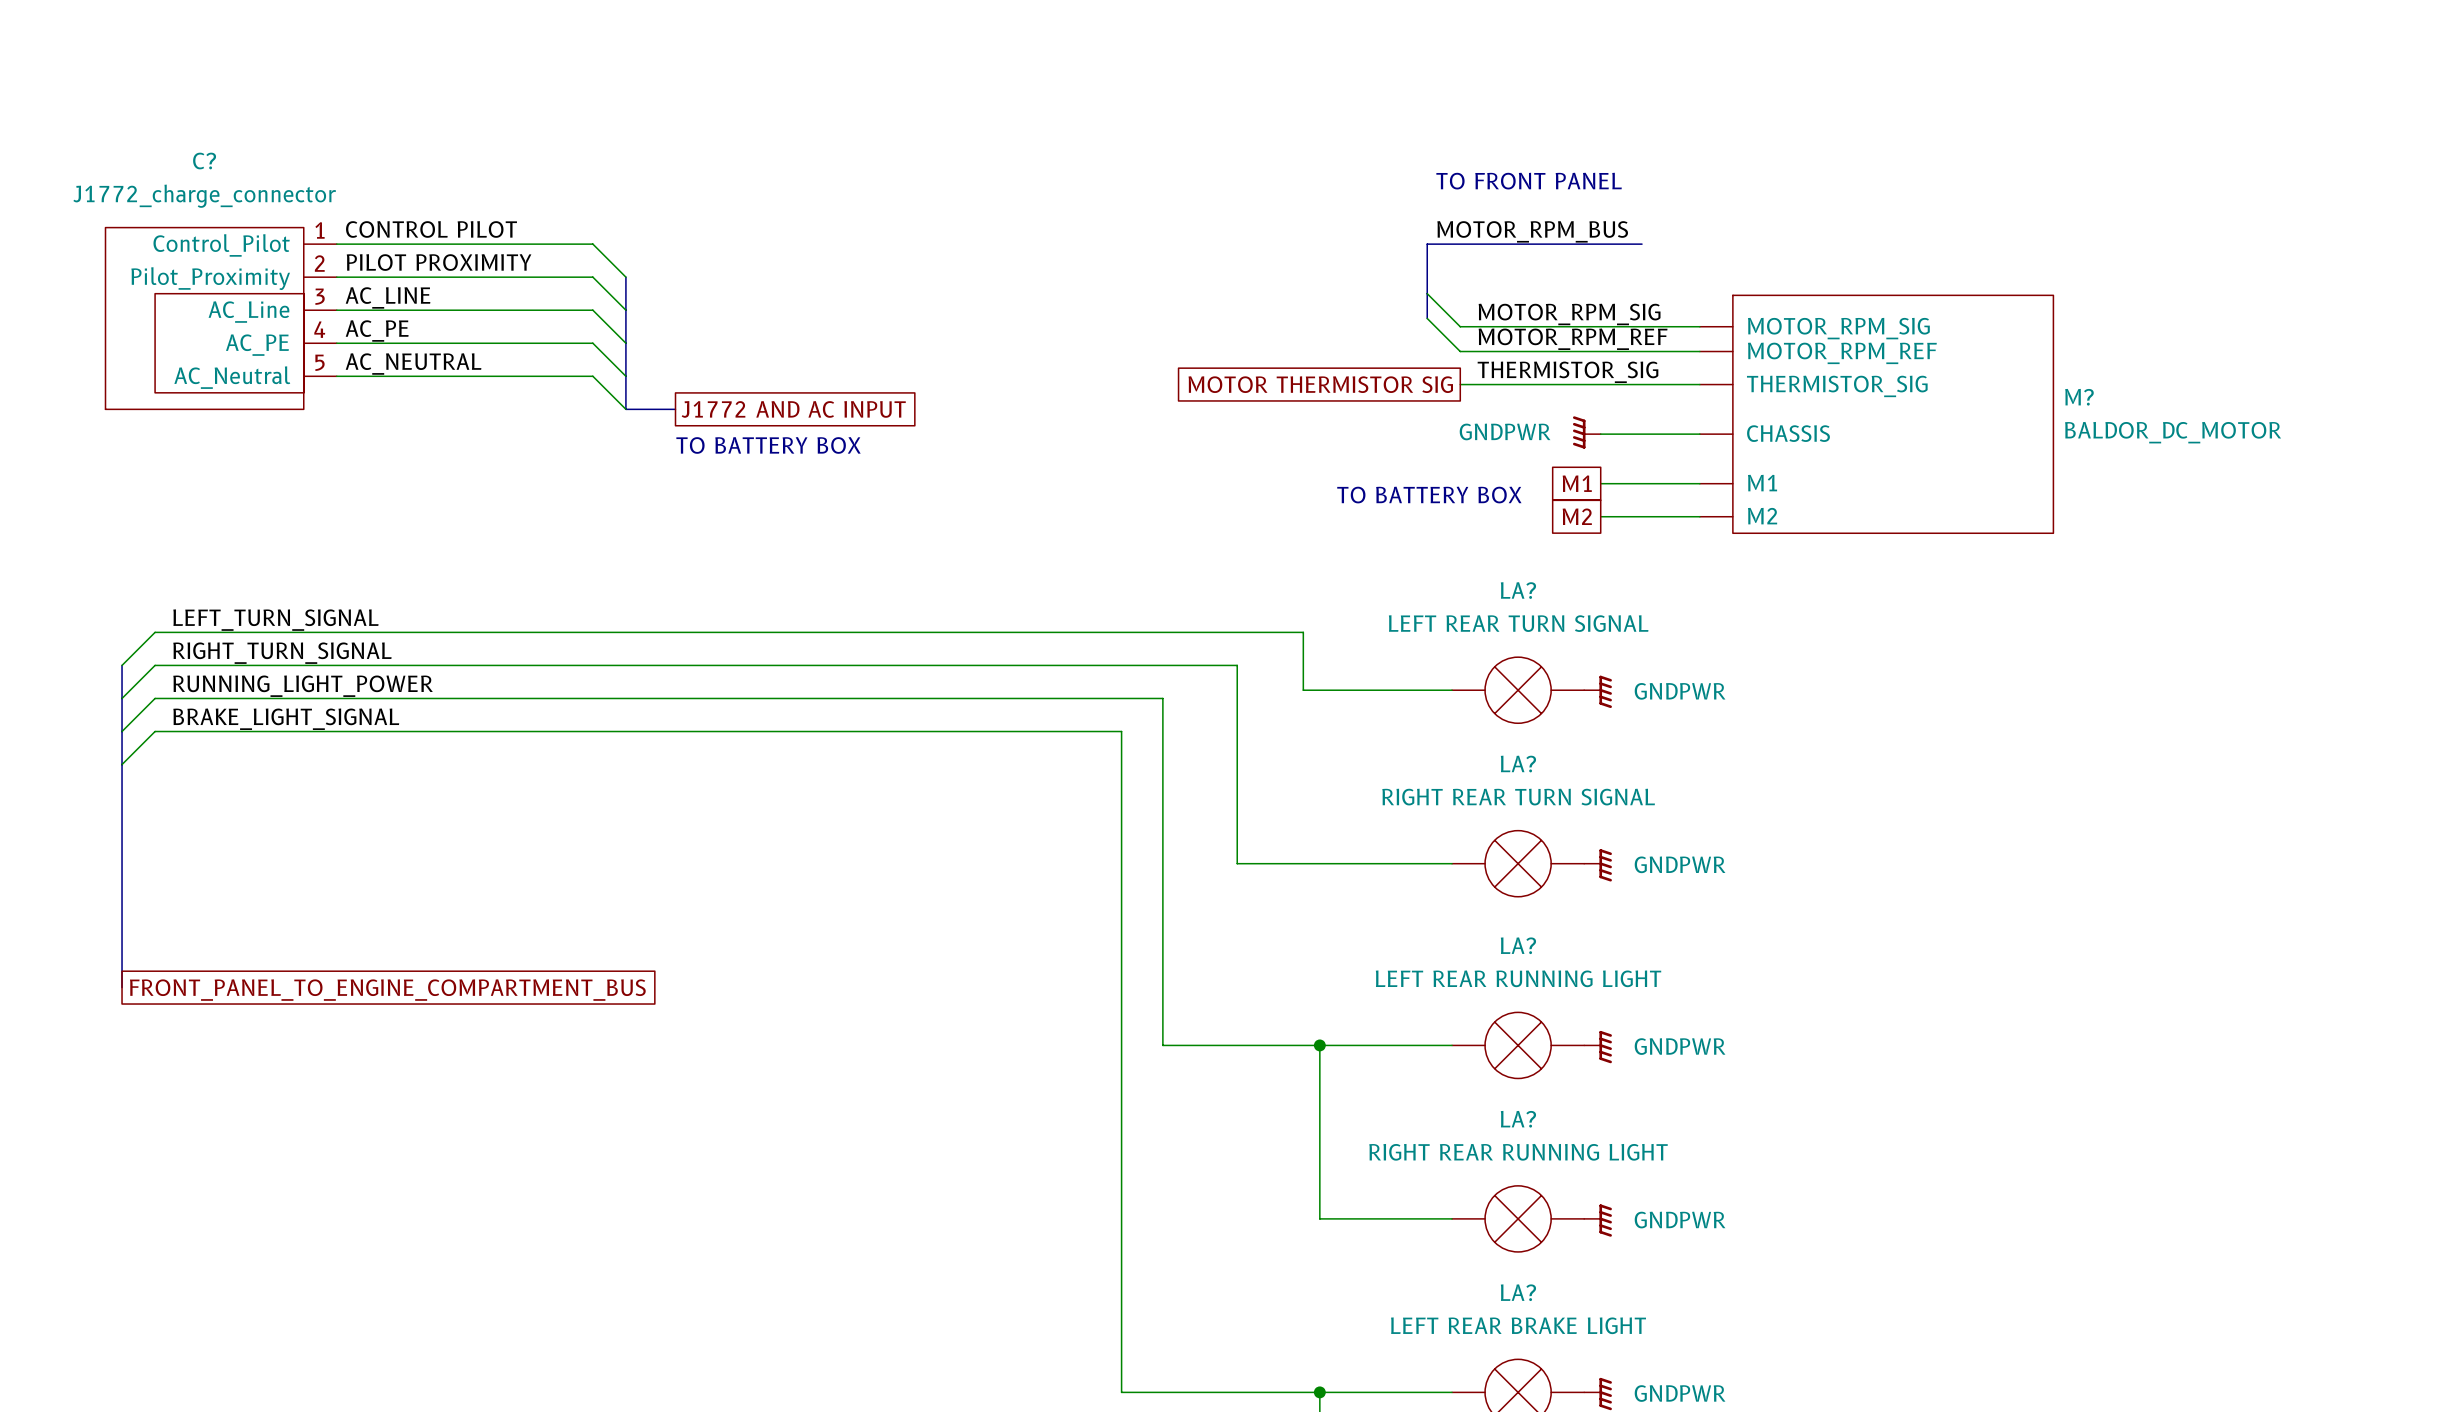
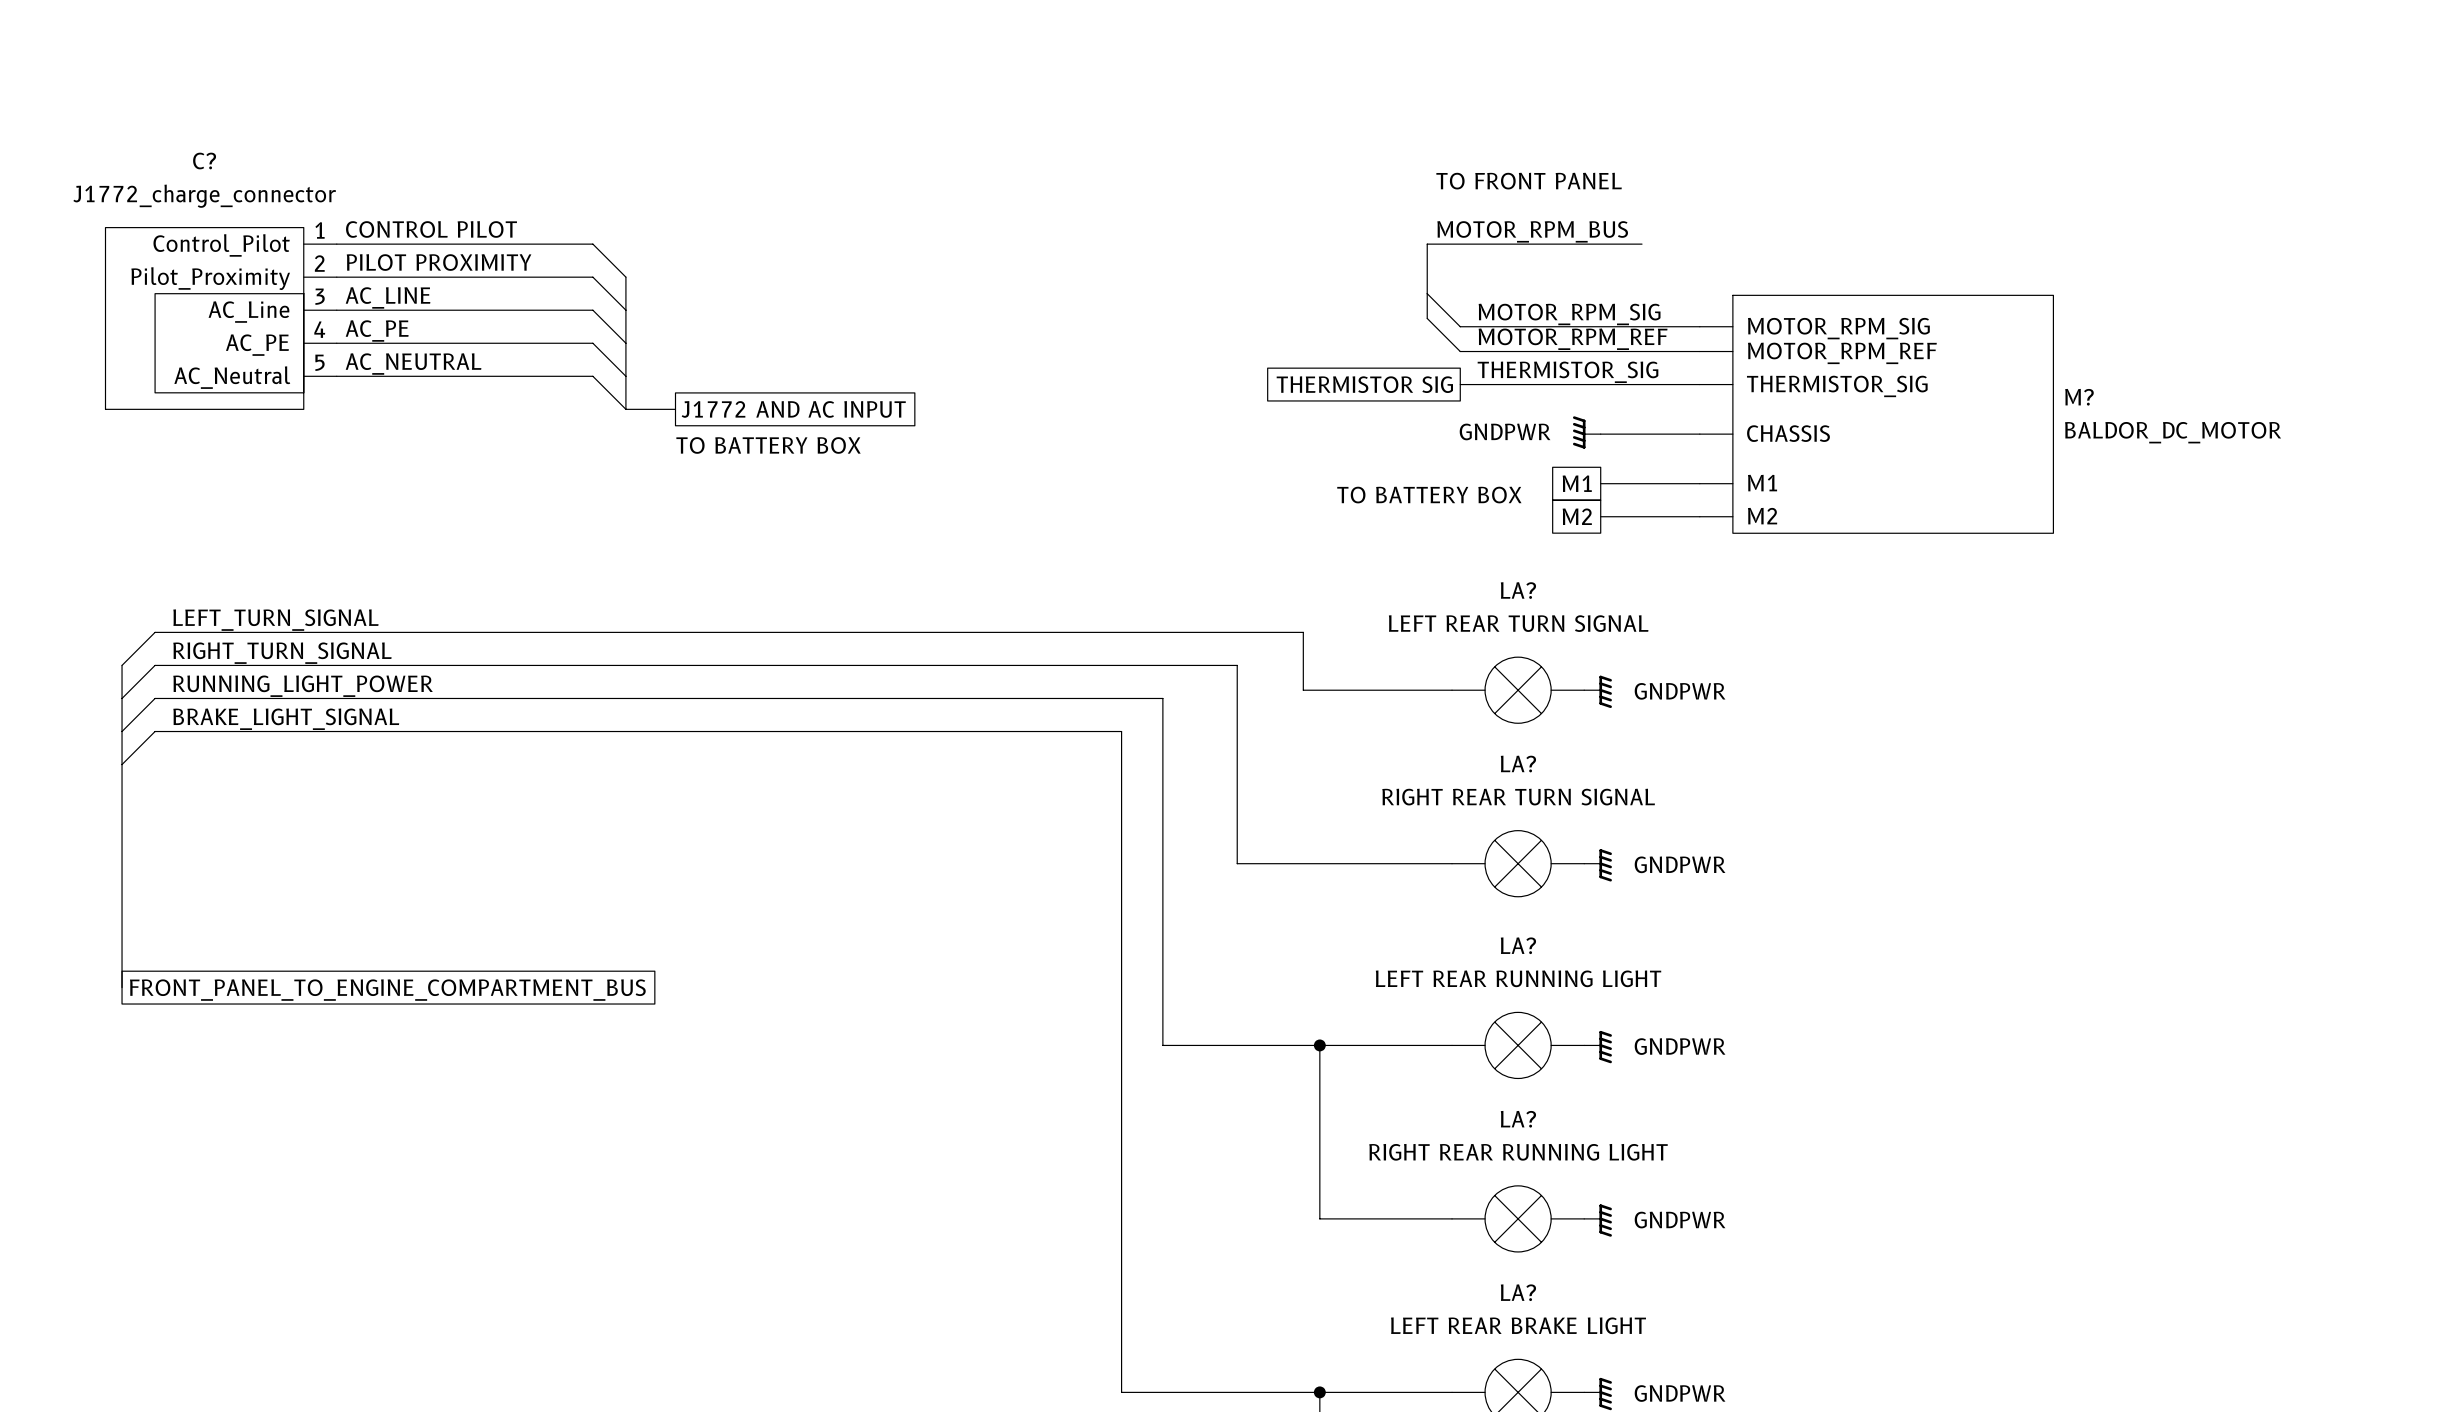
global label: MOTOR THERMISTOR SIG (1320, 384) -> THERMISTOR SIG (1364, 384)

